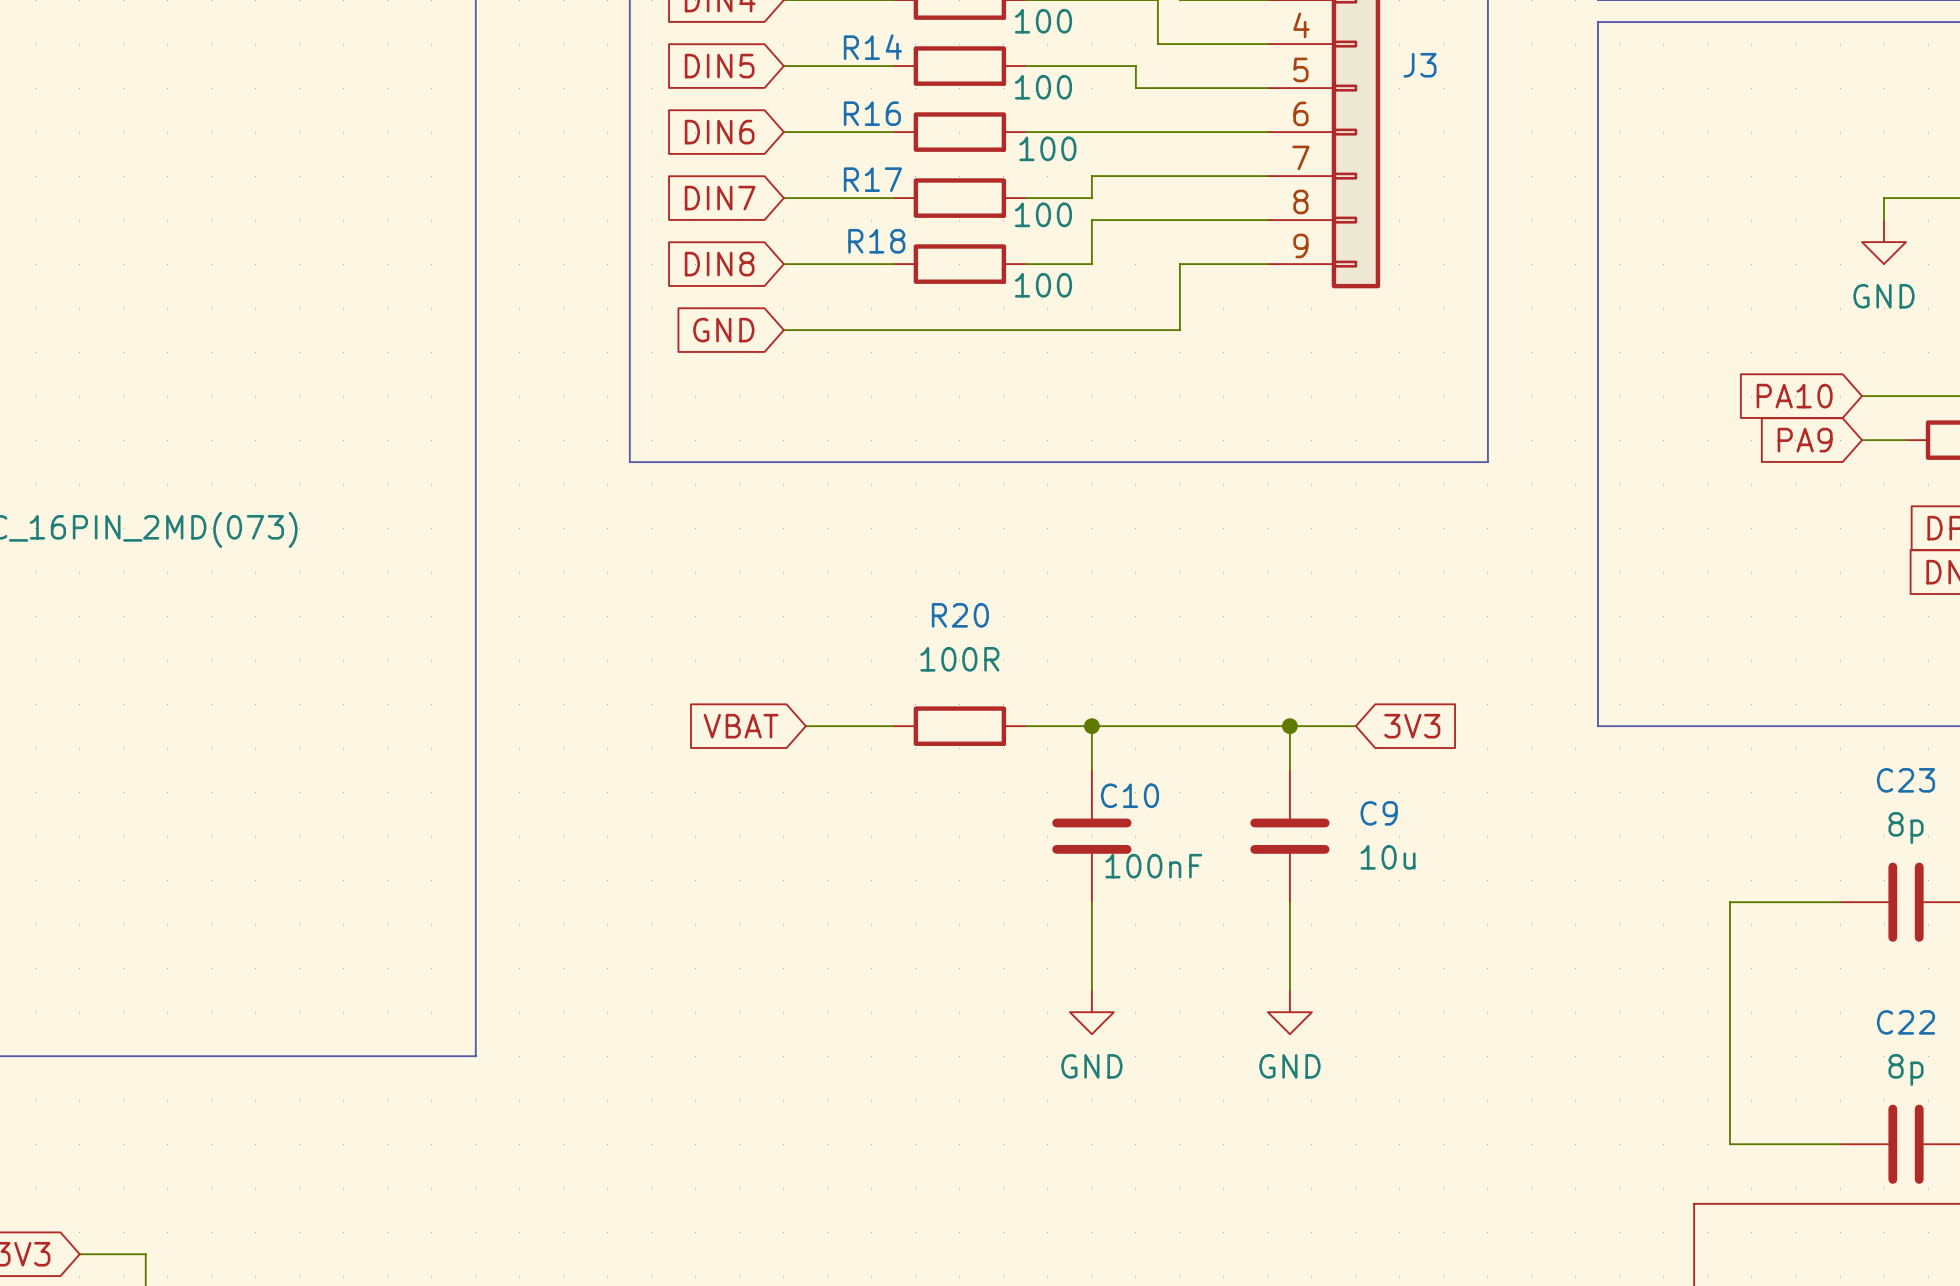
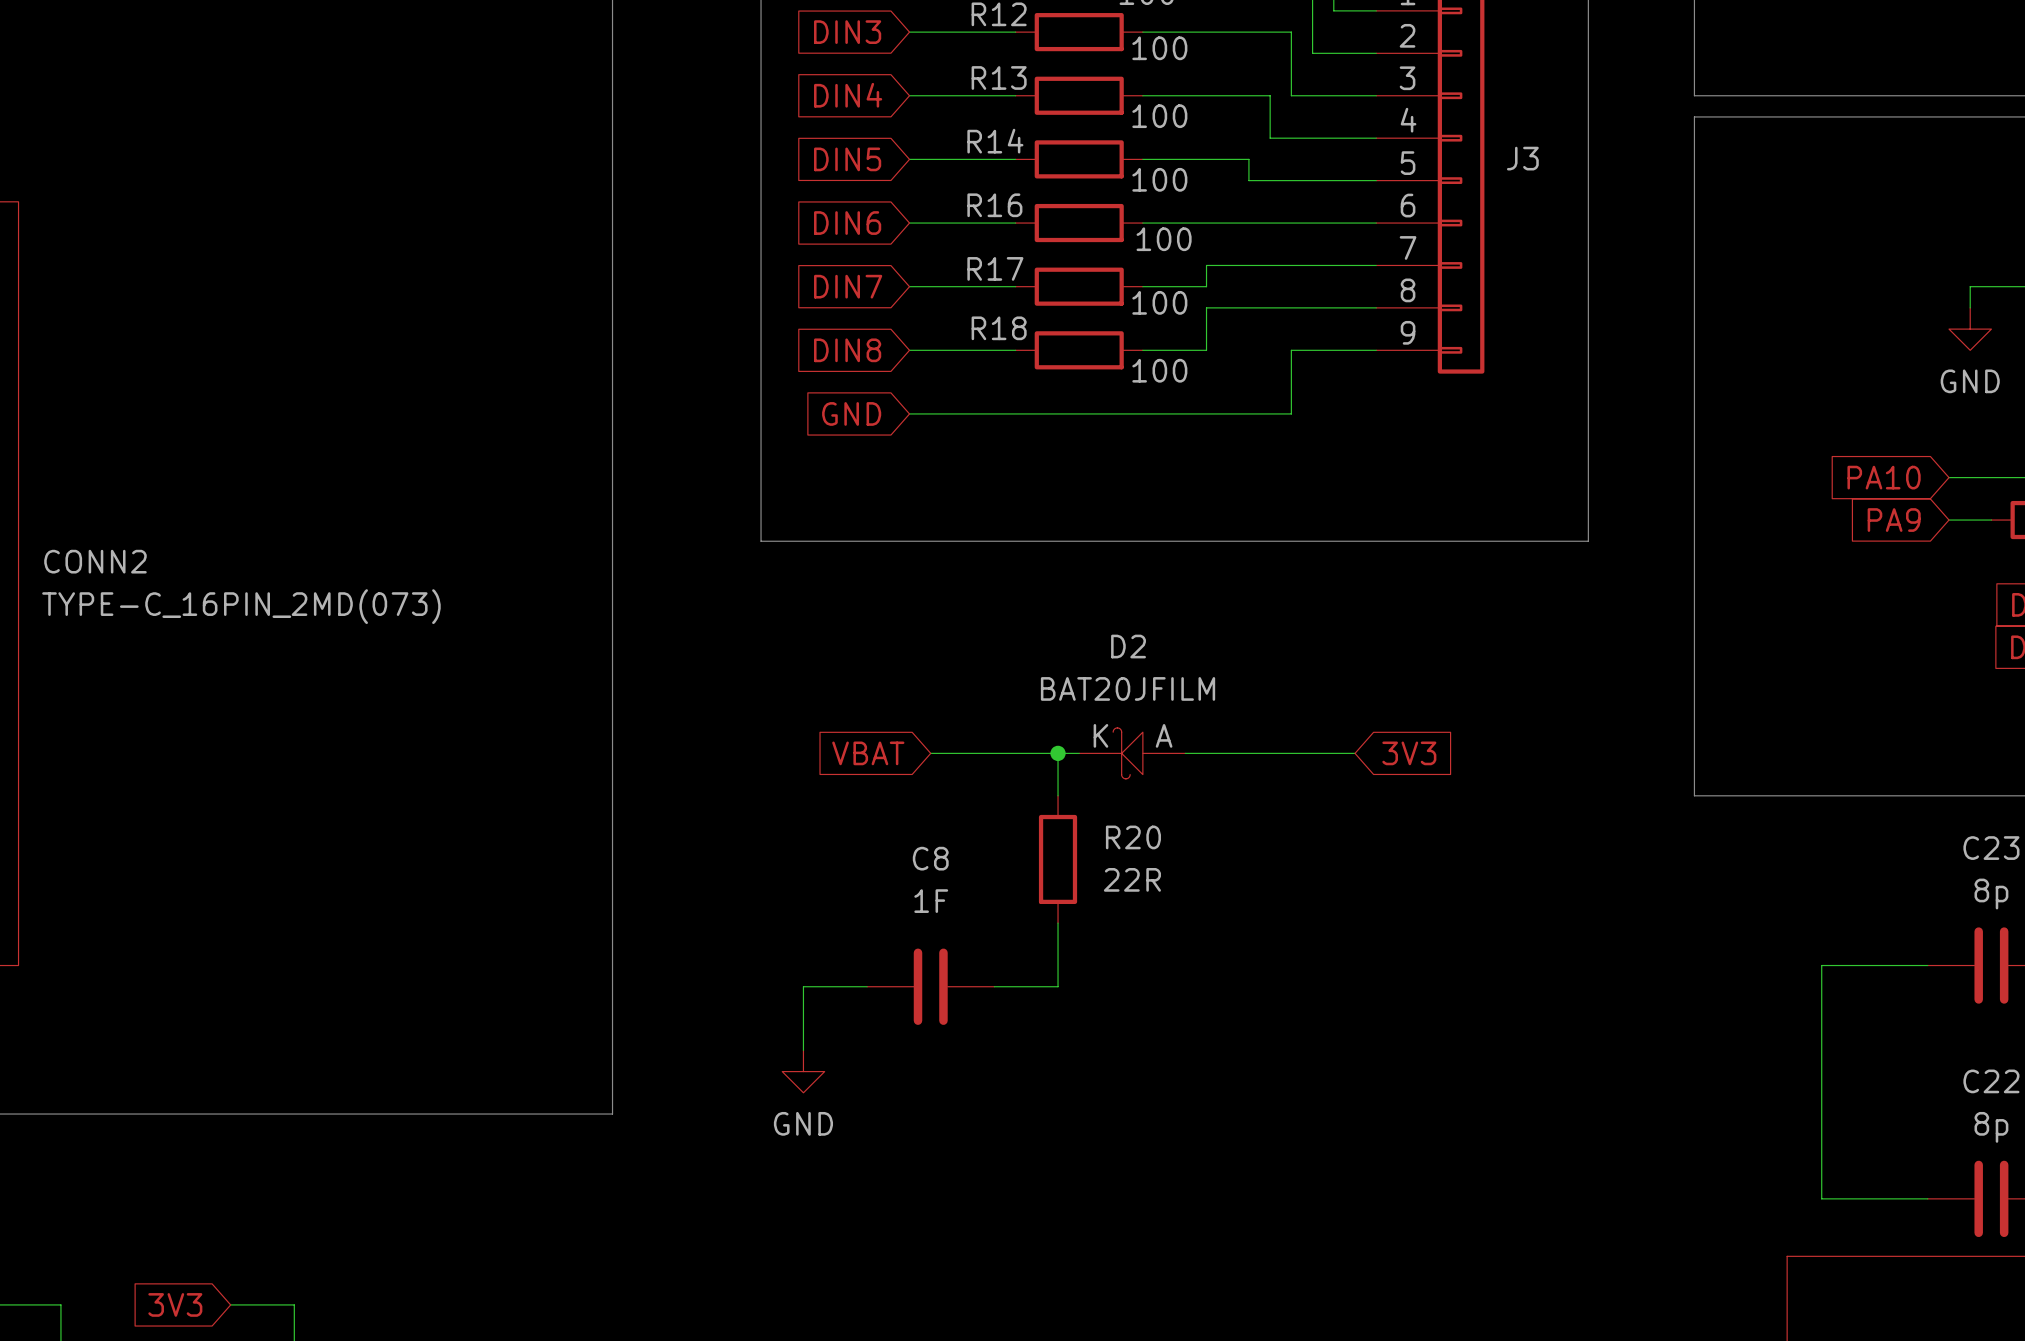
R20 name position: R20 (960, 615) -> R20 (1133, 837)
R20 value: 100R (959, 659) -> 22R (1132, 879)
wire: none -> (930, 753) (1079, 753)
junction: none -> (1058, 753)
D2: none -> BAT20JFILM (1132, 753)
wire: none -> (1185, 753) (1355, 753)
global label position: VBAT (741, 726) -> VBAT (868, 753)
wire: (805, 726) (893, 726) -> none
R20 rotation: 0° (959, 726) -> 90° clockwise (1058, 859)
wire: (1025, 726) (1355, 726) -> none
wire: (1091, 726) (1091, 770) -> (1058, 753) (1058, 795)
junction: (1091, 726) -> none
wire: (1289, 726) (1289, 770) -> none
junction: (1289, 726) -> none
global label position: 3V3 (1412, 726) -> 3V3 (1409, 753)
C10: 100nF (1091, 836) -> none
C9: 10u (1289, 836) -> none
wire: none -> (1058, 923) (1058, 986) (994, 986)
wire: (1091, 902) (1091, 990) -> none
wire: (1289, 902) (1289, 990) -> none
wire: none -> (867, 986) (803, 986) (803, 1050)
C8: none -> 1F (930, 986)
power symbol: none -> GND (803, 1071)
power symbol: GND (1091, 1012) -> none
power symbol: GND (1289, 1012) -> none

